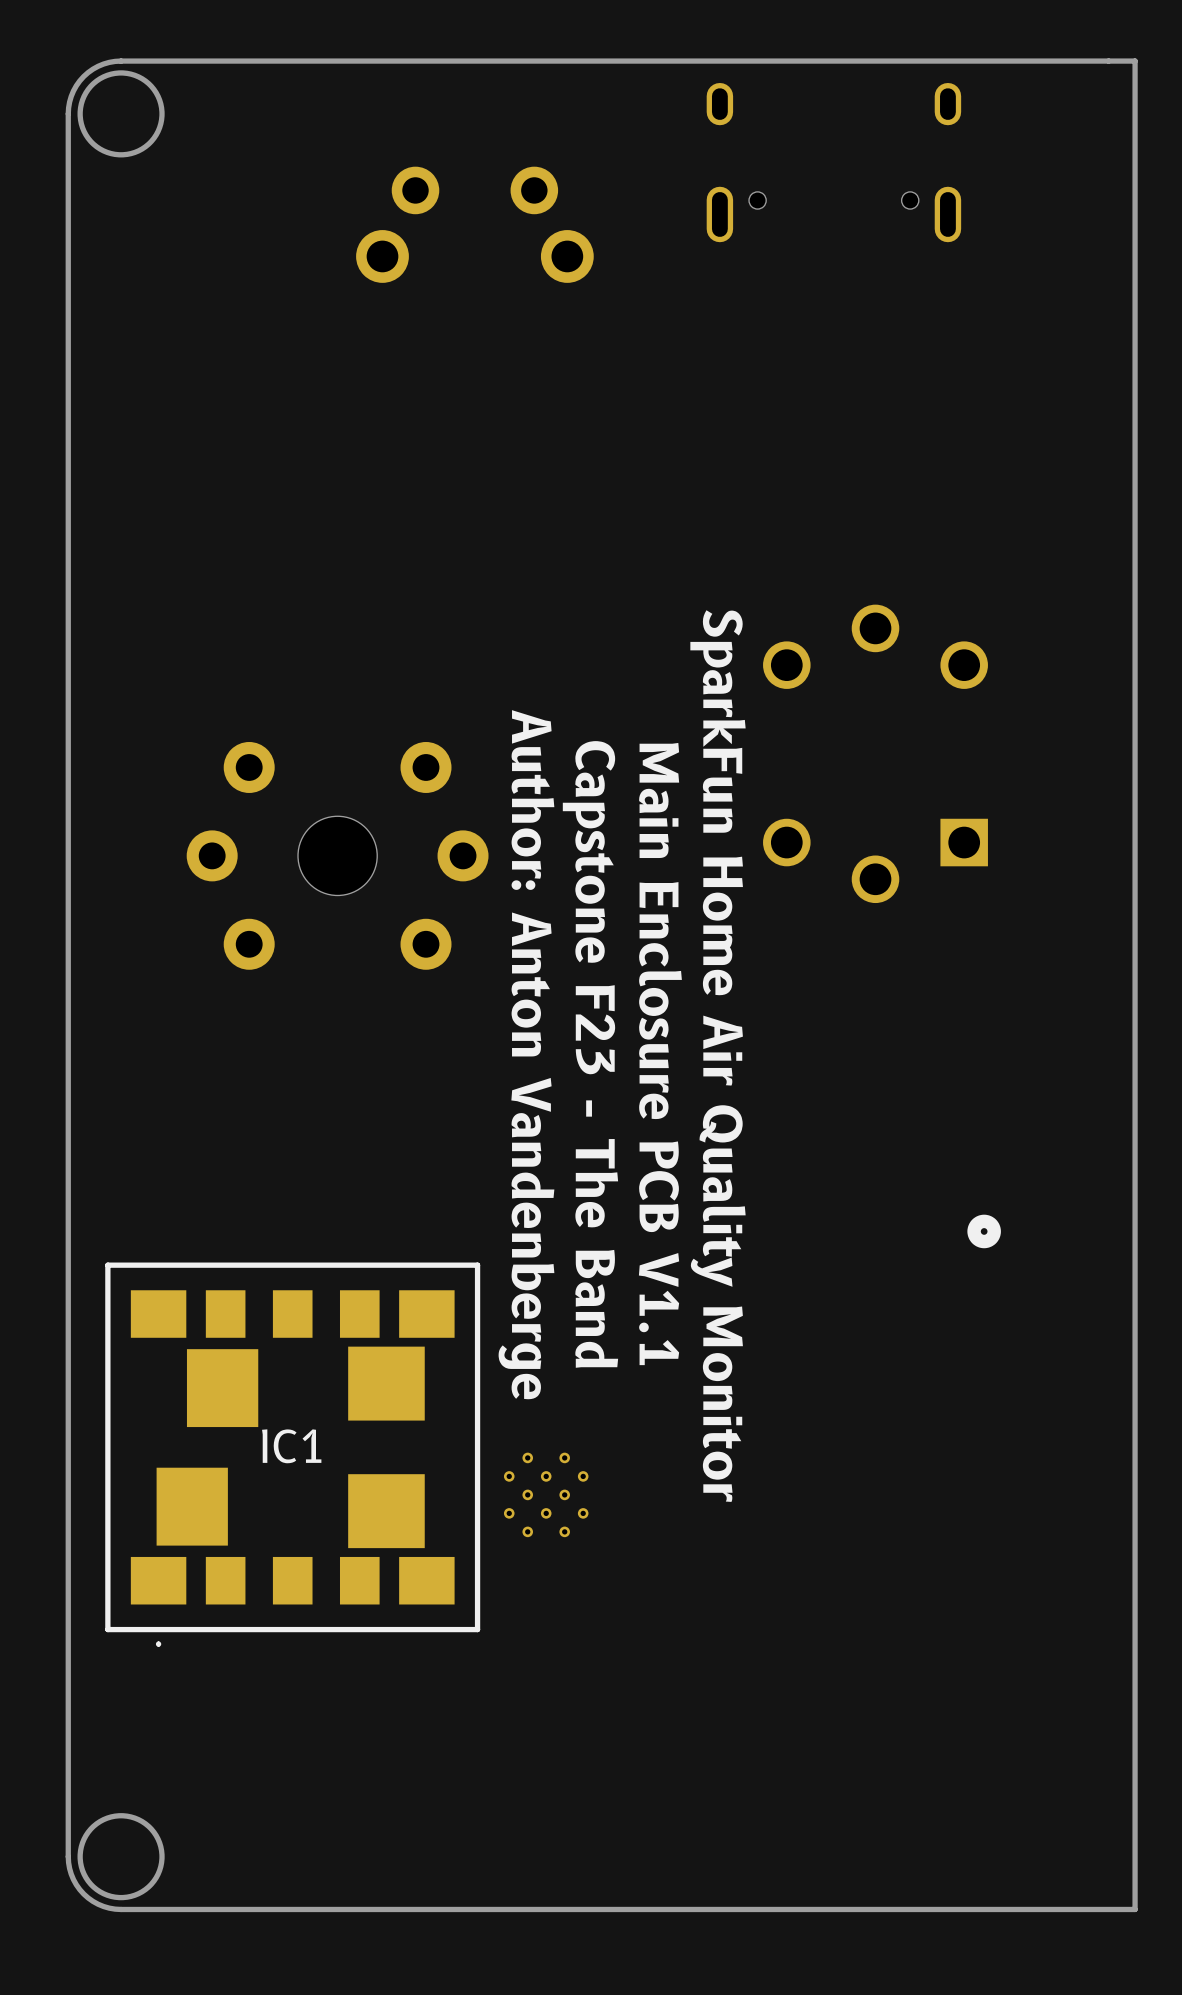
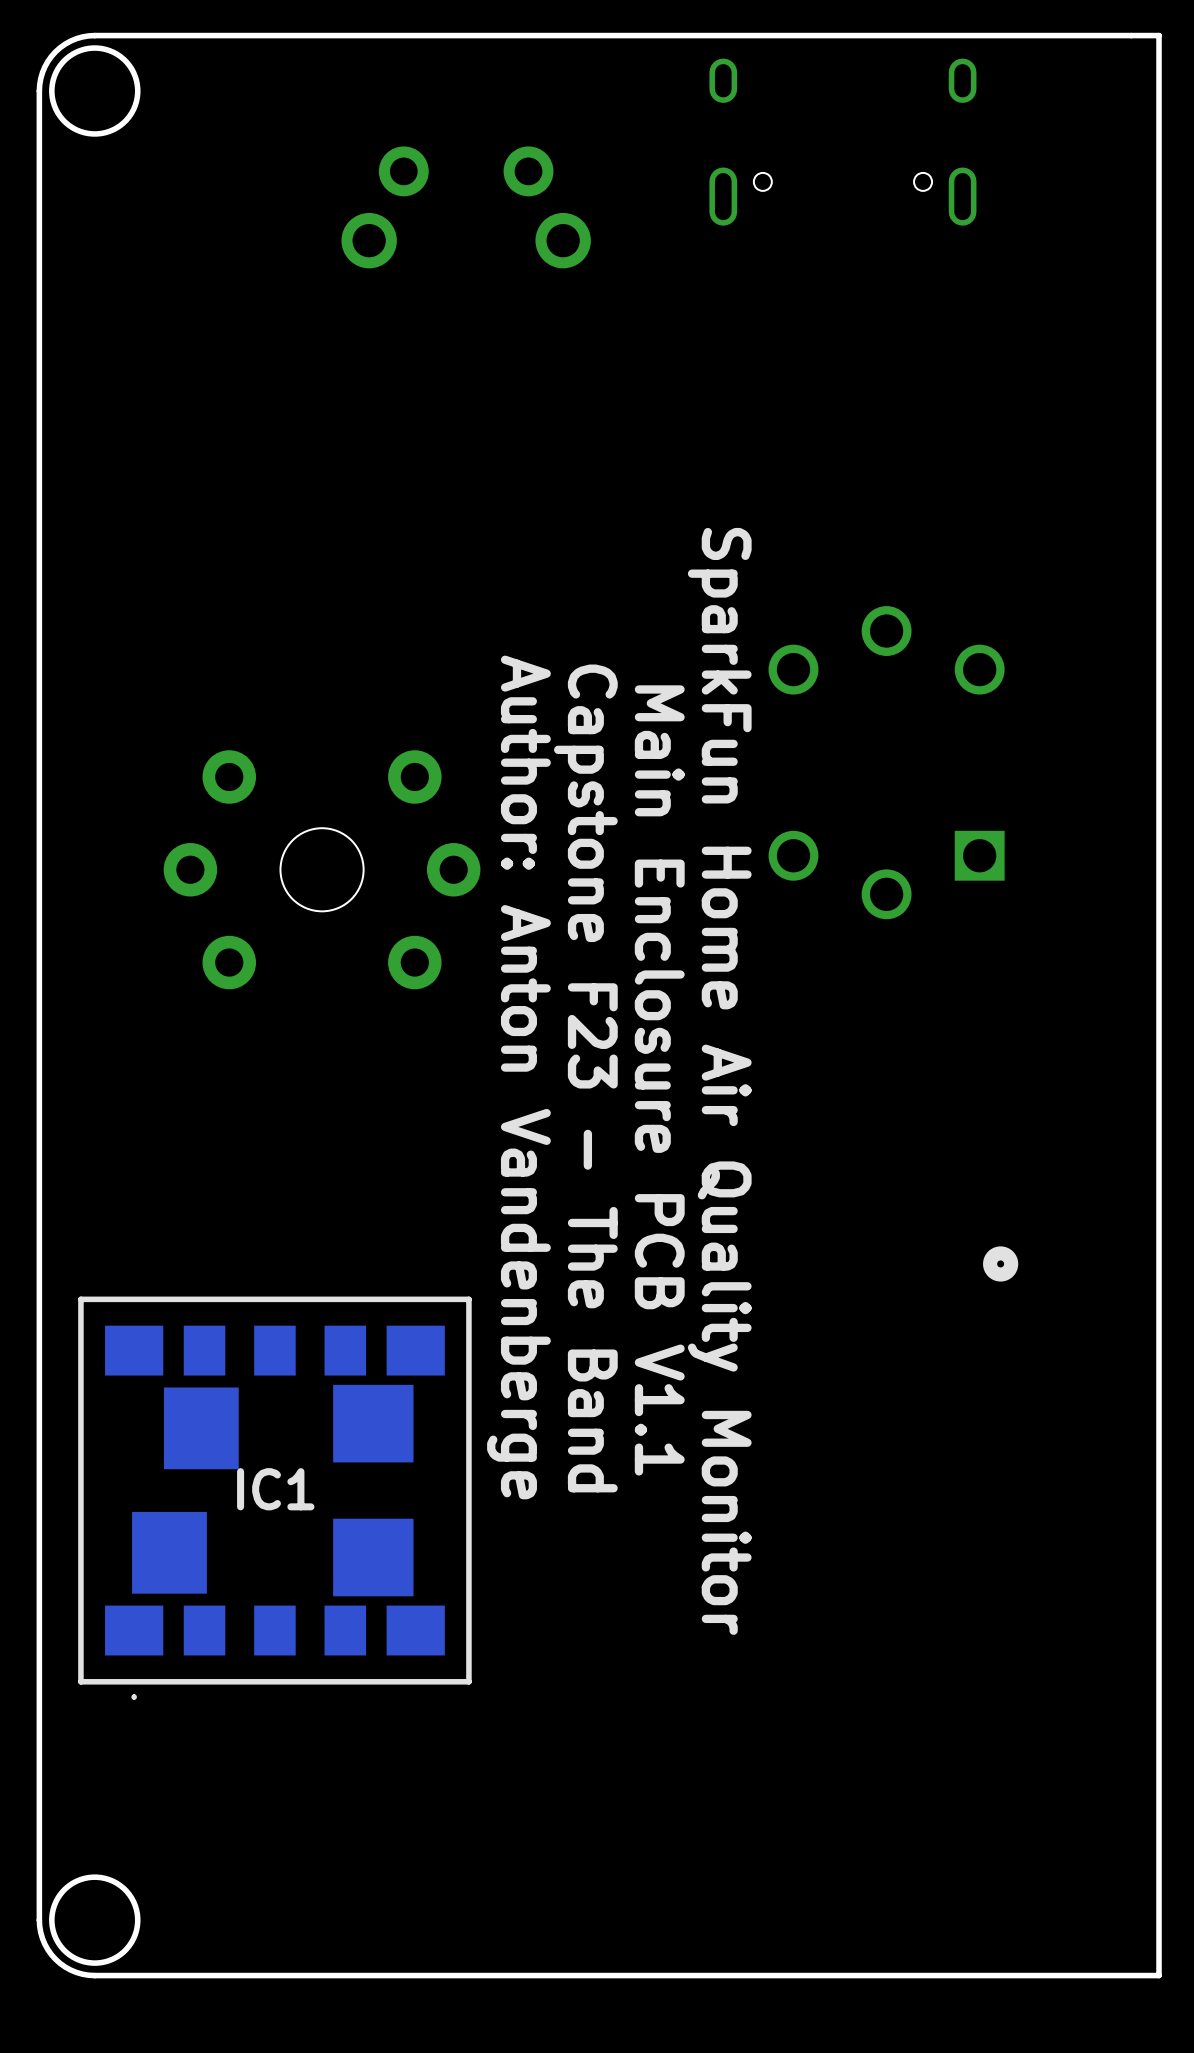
part: (546, 1494) -> none

